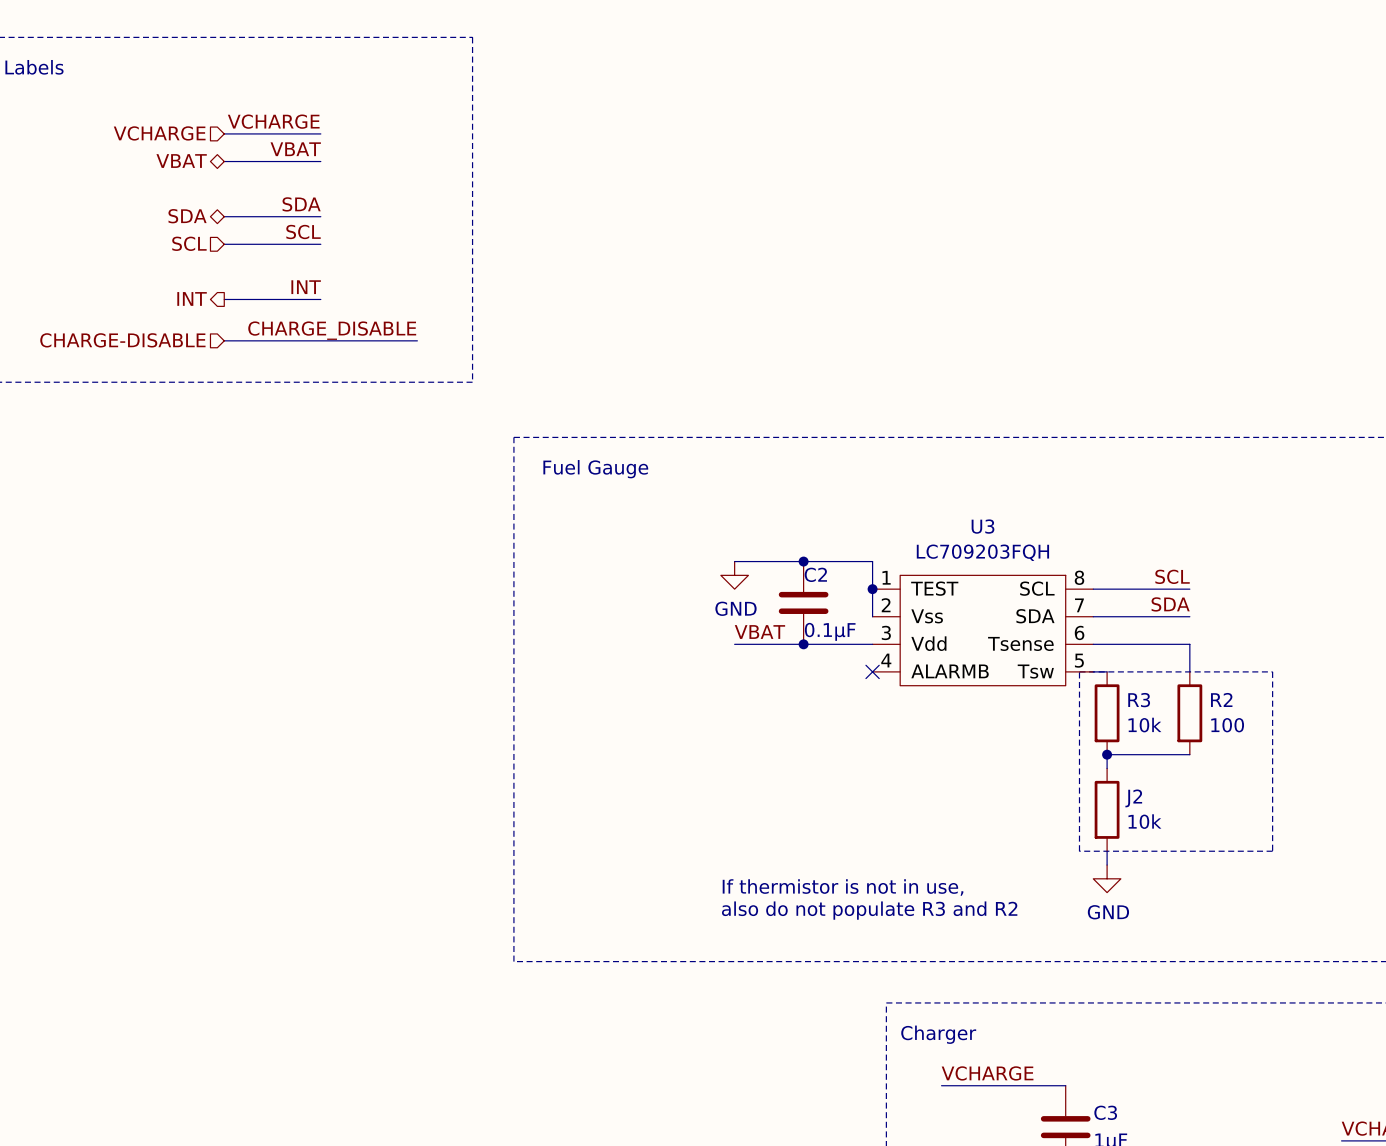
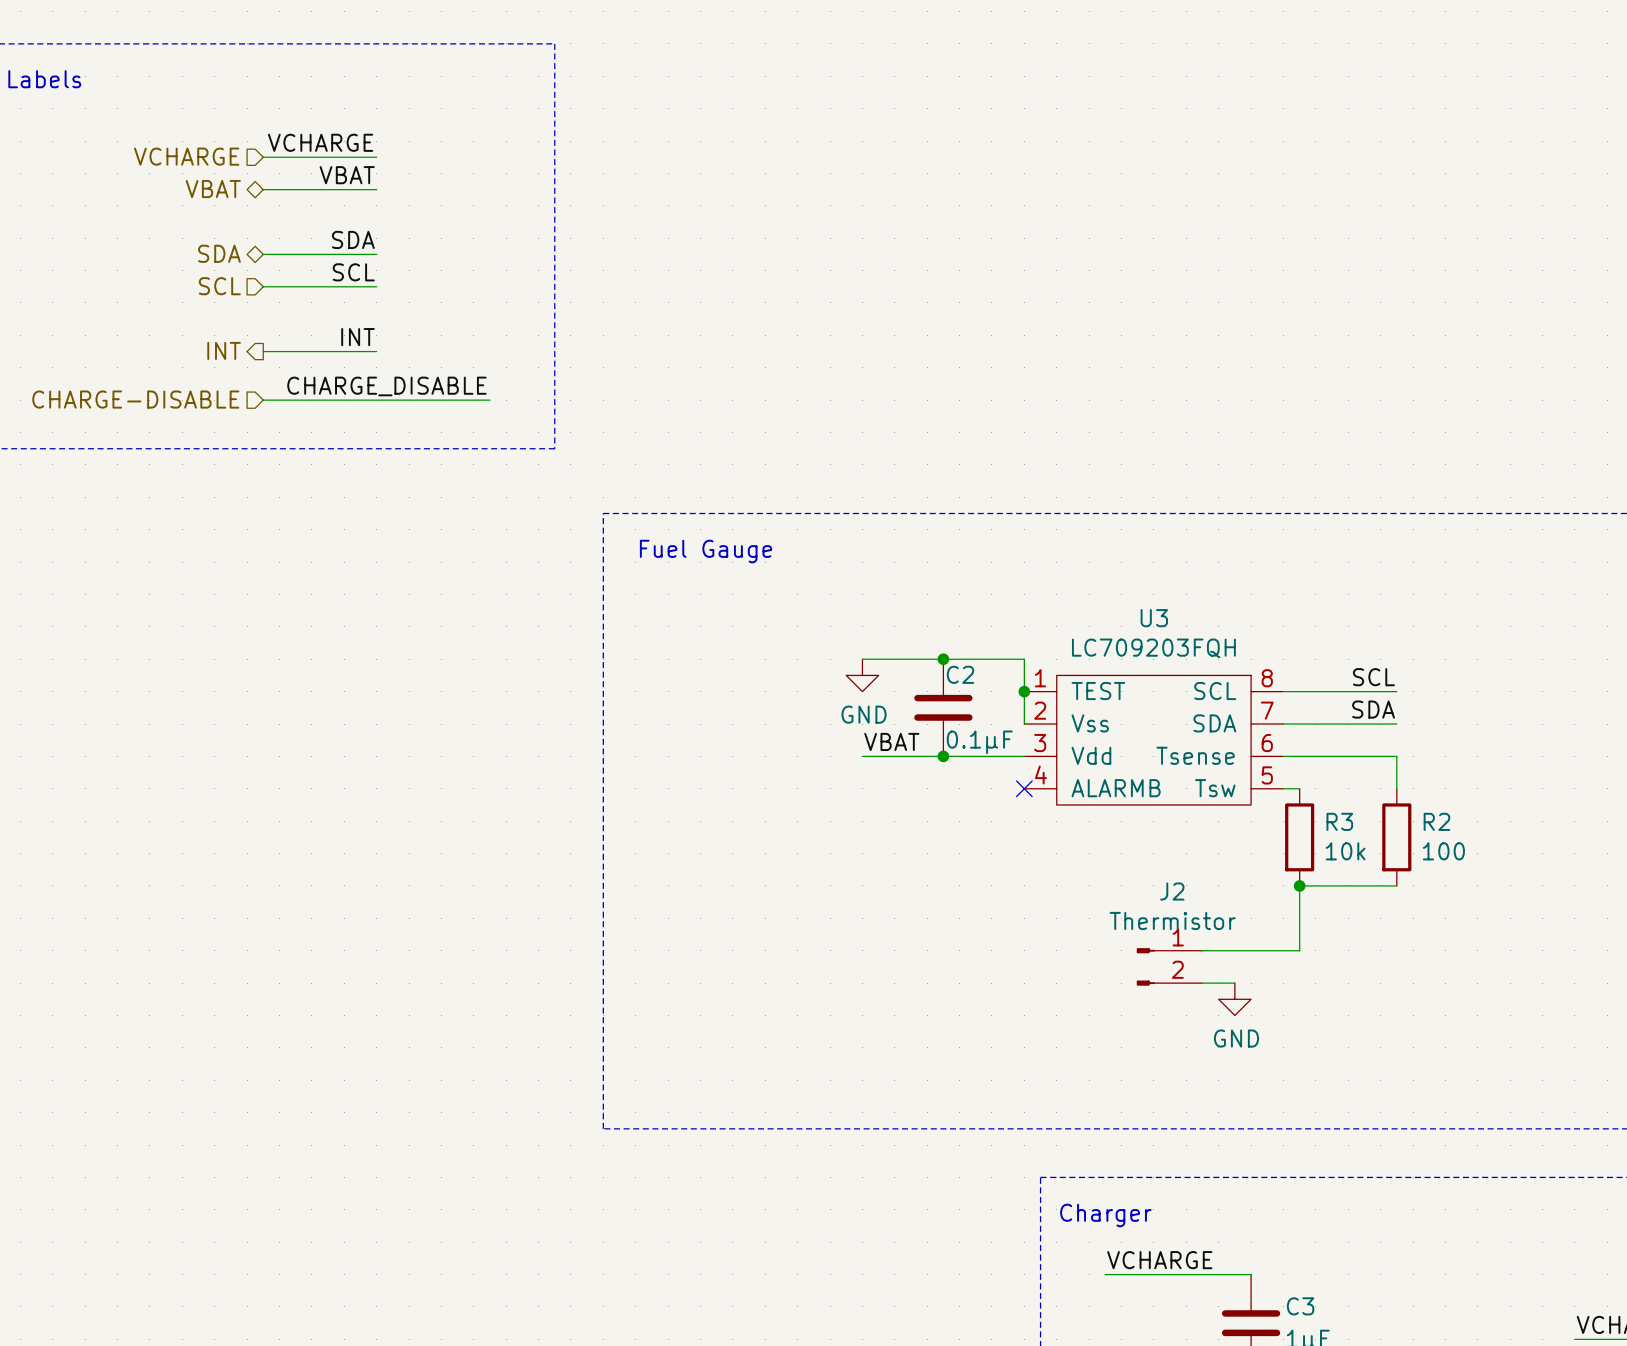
line: (1079, 671) (1079, 851) (1272, 851) (1272, 671) (1079, 671) -> none
J2 symbol: [1094, 768, 1120, 852] -> [1136, 948, 1203, 986]
wire: none -> (1299, 902) (1299, 950) (1202, 950)
J2 name position: J2 (1133, 798) -> J2 (1172, 891)
J2 value: 10k (1144, 821) -> Thermistor (1172, 920)
wire: none -> (1202, 983) (1234, 983)
wire: (1107, 851) (1107, 865) -> none
power symbol position: GND (1107, 878) -> GND (1234, 999)
text: If thermistor is not in use, (843, 887) -> none
text: also do not populate R3 and R2 (869, 910) -> none

